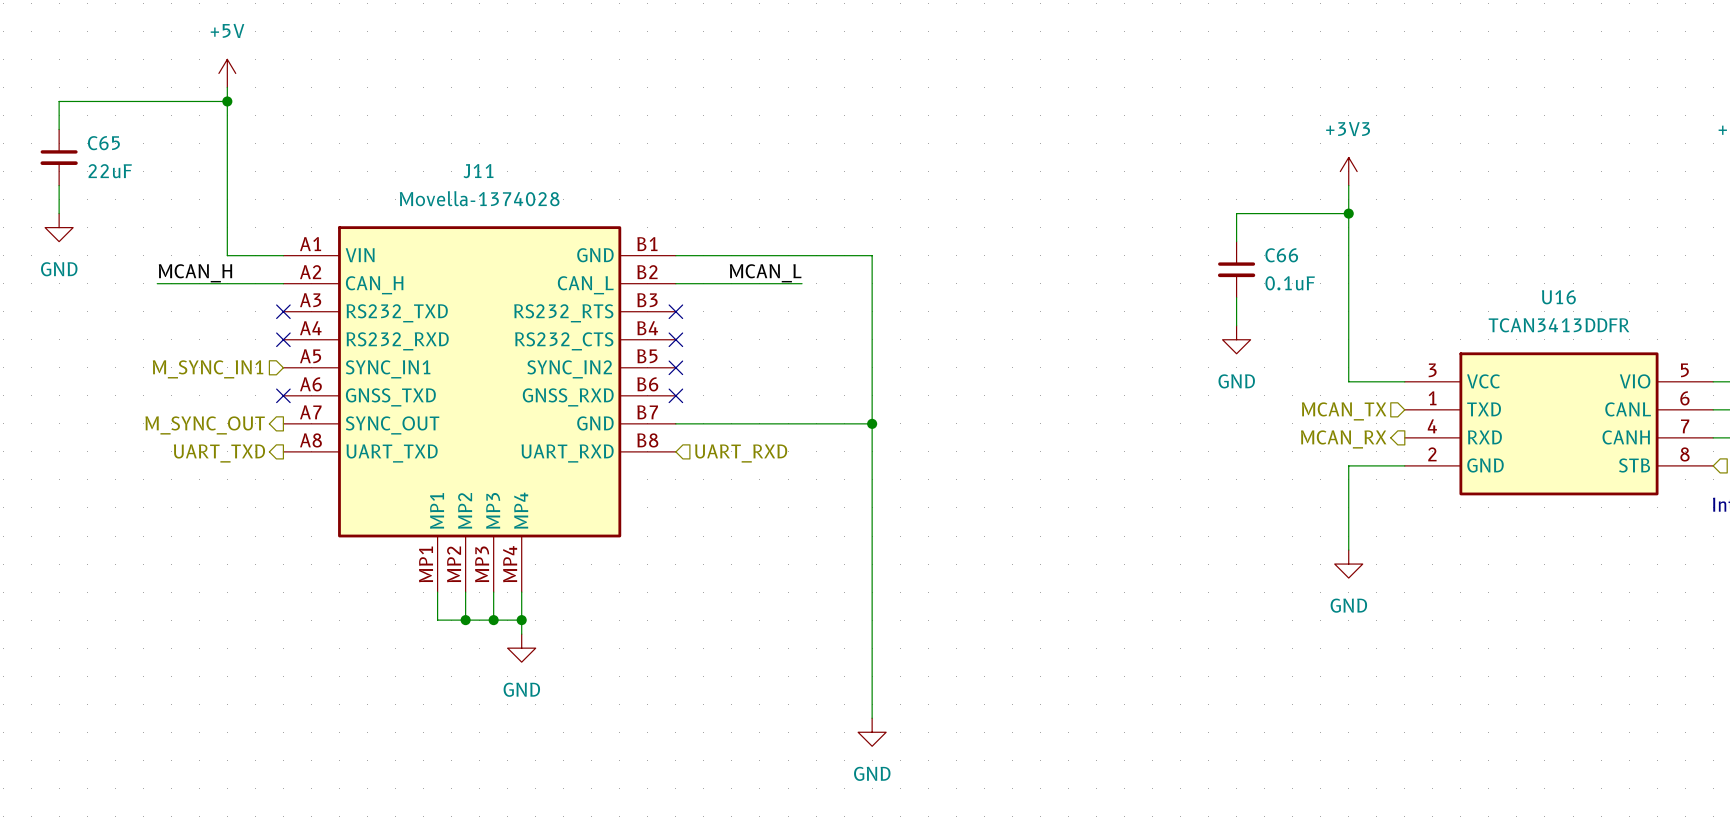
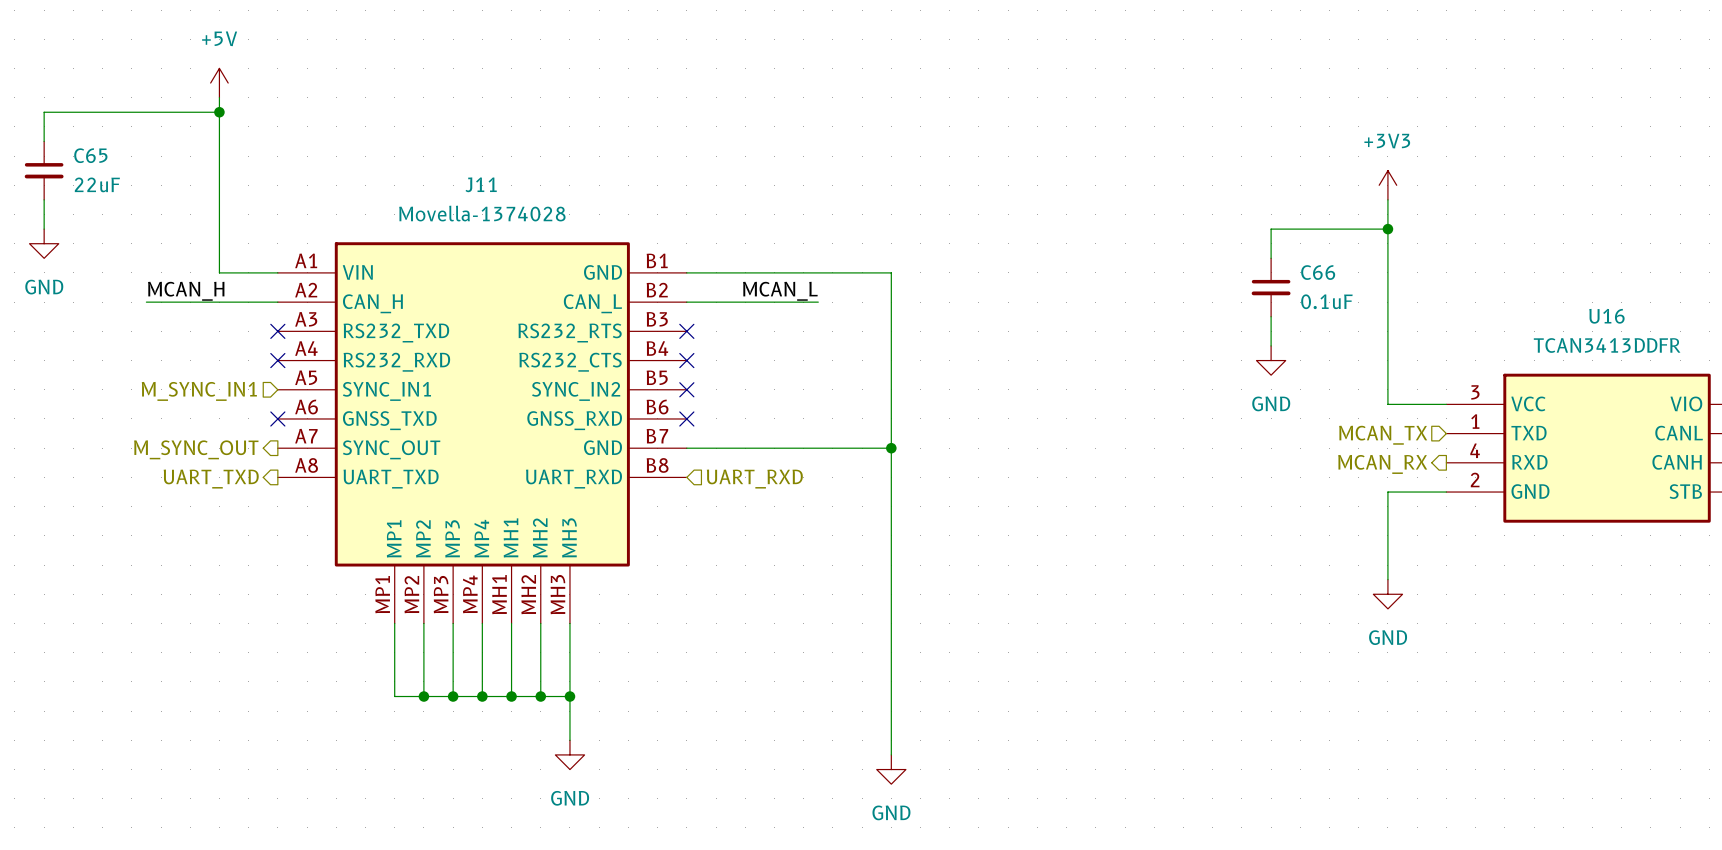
J11 symbol: [283, 226, 676, 593] -> [277, 242, 687, 624]
wire: none -> (394, 623) (394, 696) (569, 696)
wire: none -> (423, 623) (423, 696)
wire: (437, 592) (437, 620) (521, 620) -> none
wire: none -> (453, 623) (453, 696)
wire: (465, 592) (465, 620) -> none
wire: none -> (482, 623) (482, 696)
wire: (493, 592) (493, 620) -> none
wire: none -> (511, 623) (511, 696)
wire: (521, 592) (521, 634) -> none
wire: none -> (540, 623) (540, 696)
wire: none -> (569, 623) (569, 740)
junction: (465, 620) -> none
junction: (493, 620) -> none
junction: (521, 620) -> none
power symbol position: GND (521, 648) -> GND (569, 754)
junction: none -> (423, 696)
junction: none -> (453, 696)
junction: none -> (482, 696)
junction: none -> (511, 696)
junction: none -> (540, 696)
junction: none -> (569, 696)

